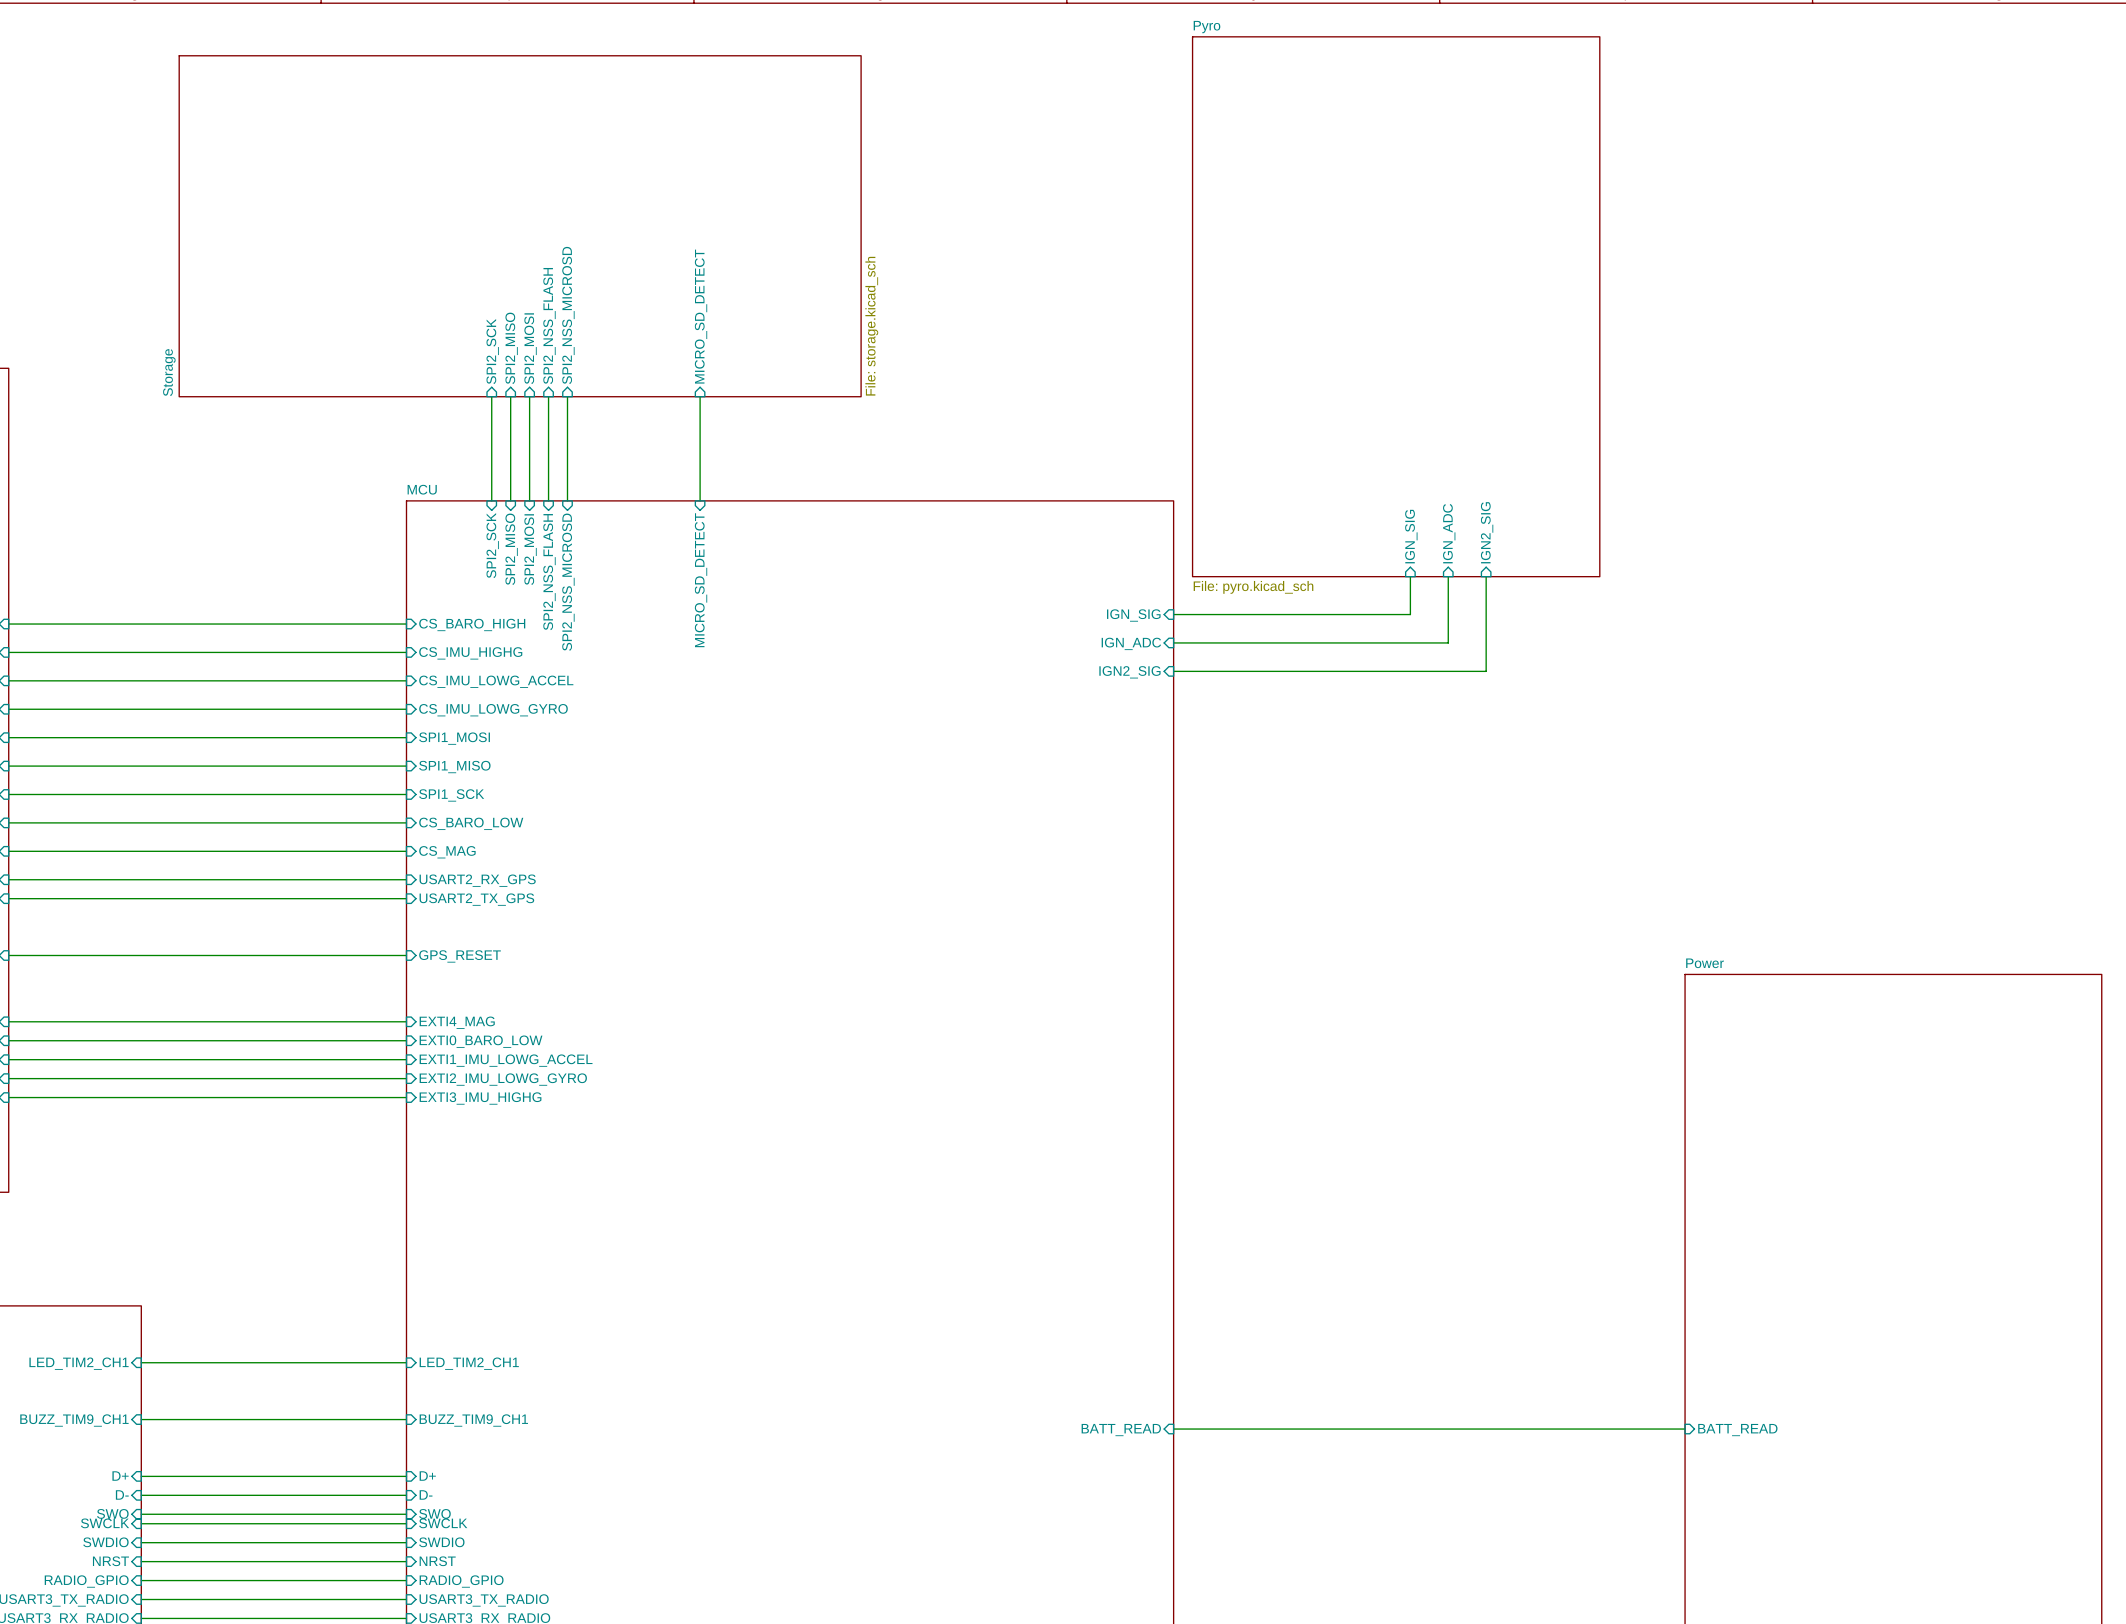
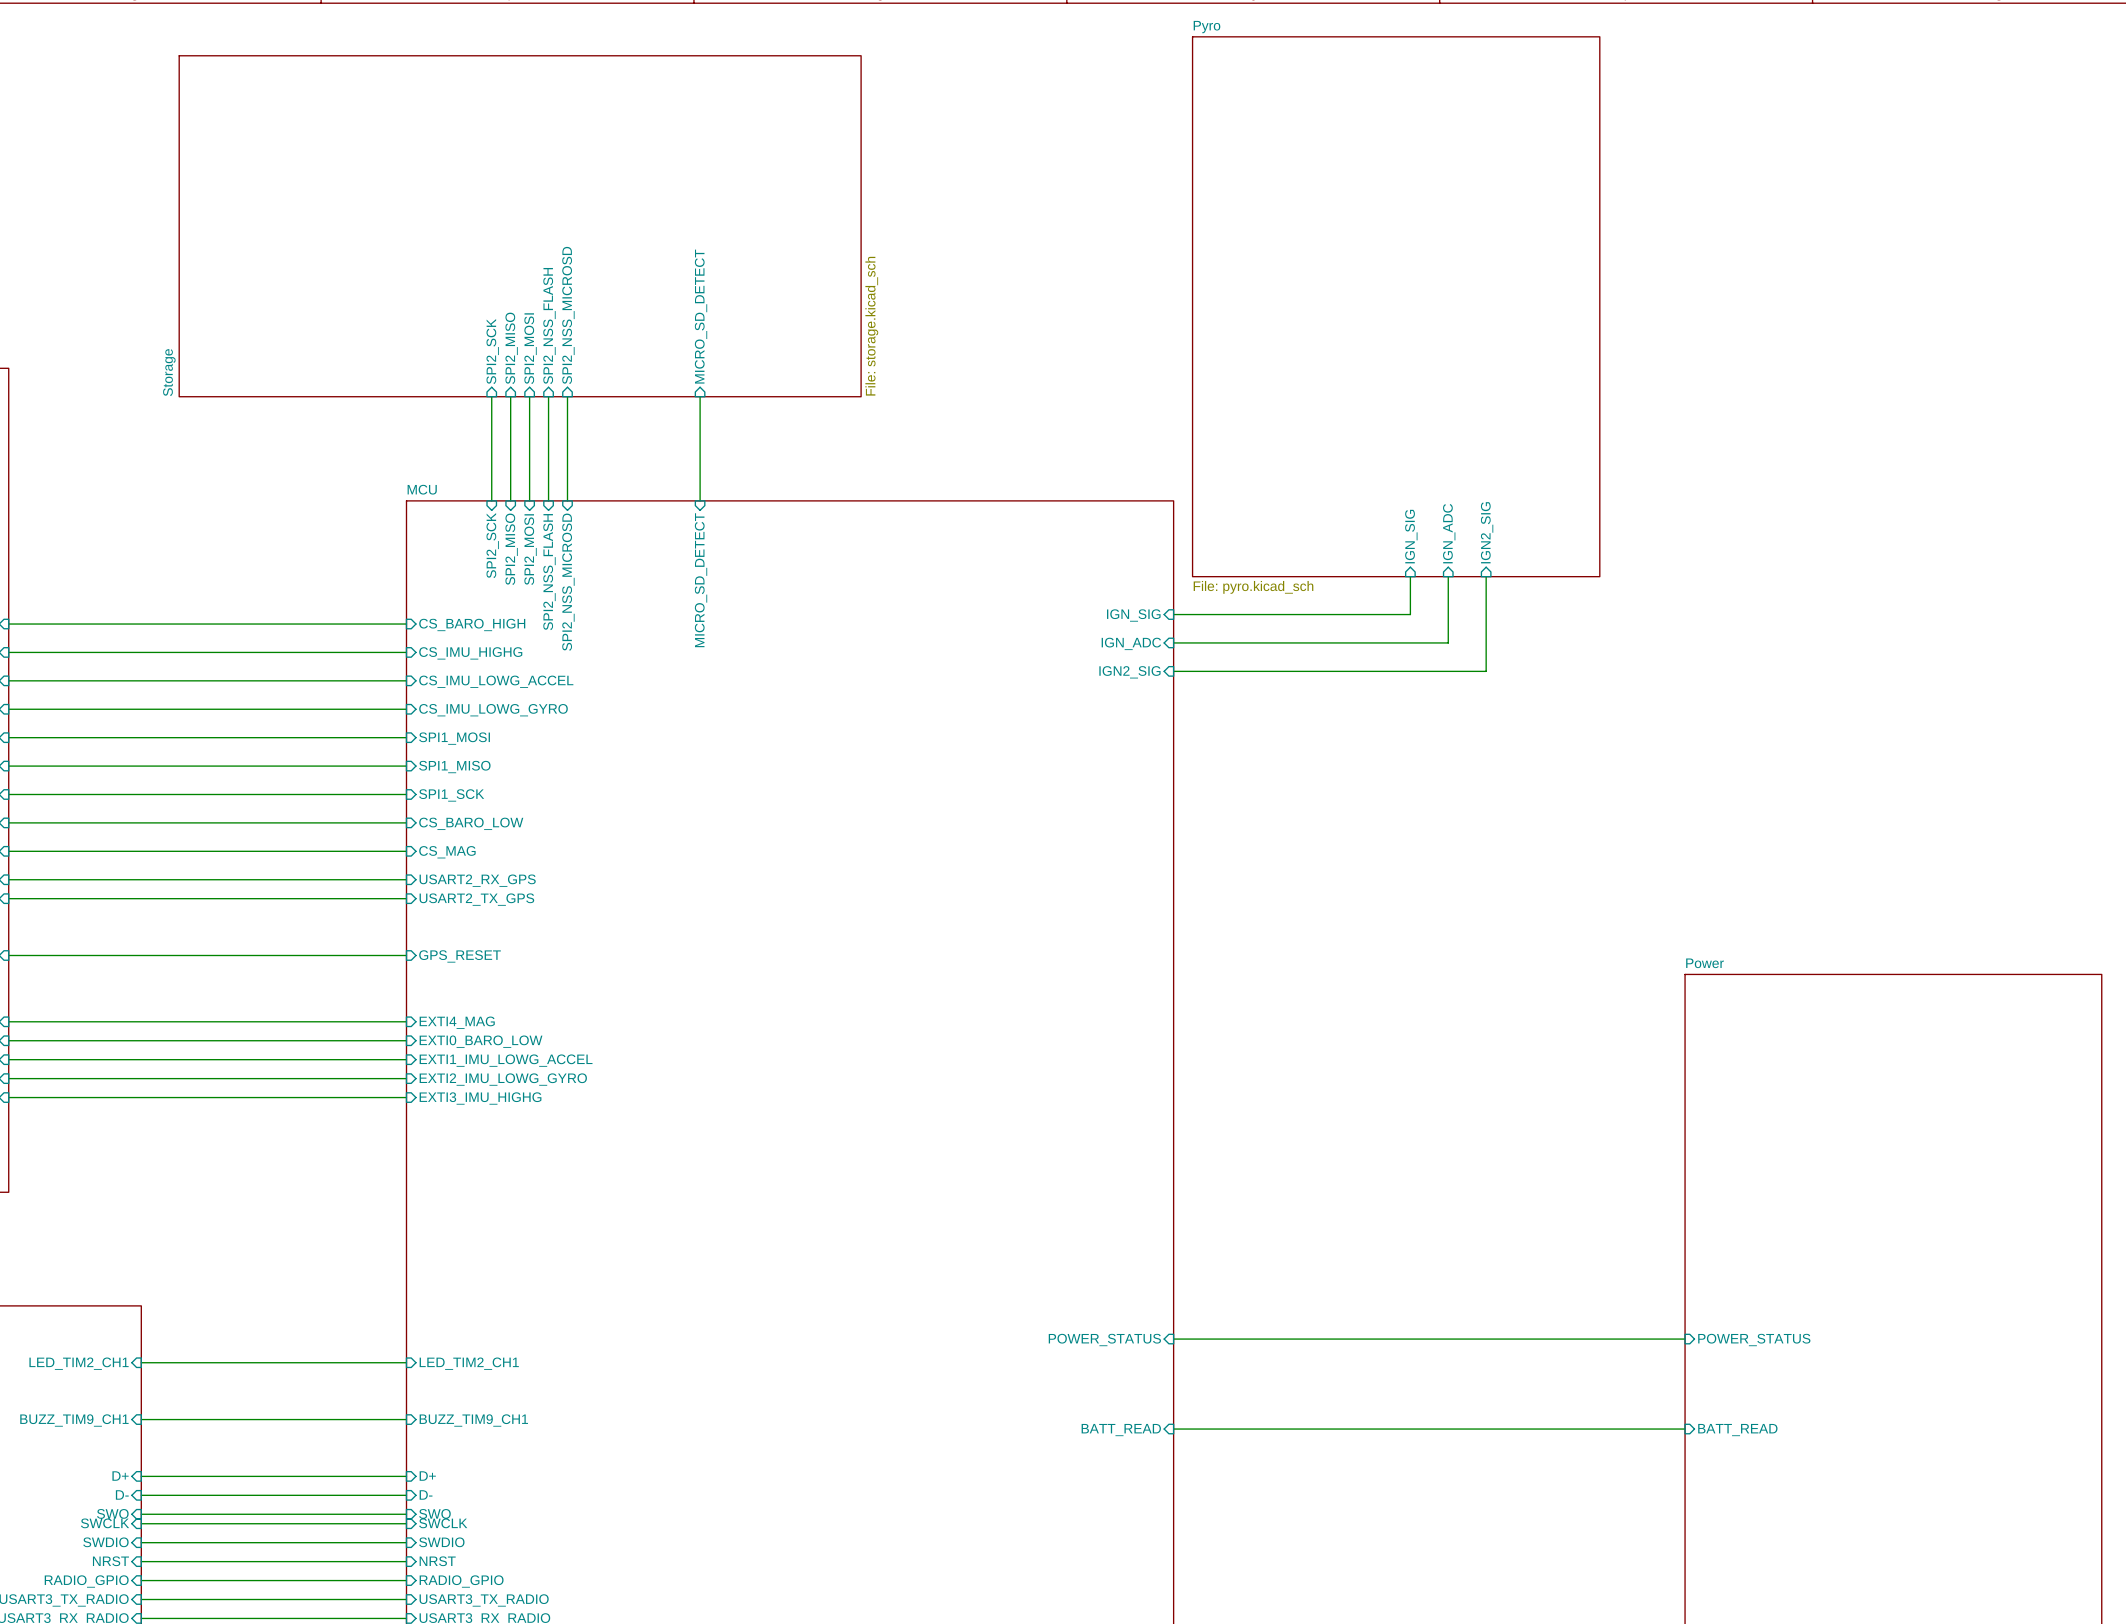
wire: none -> (1173, 1339) (1685, 1339)
sheet pin: none -> POWER_STATUS (1104, 1340)
sheet pin: none -> POWER_STATUS (1754, 1340)

